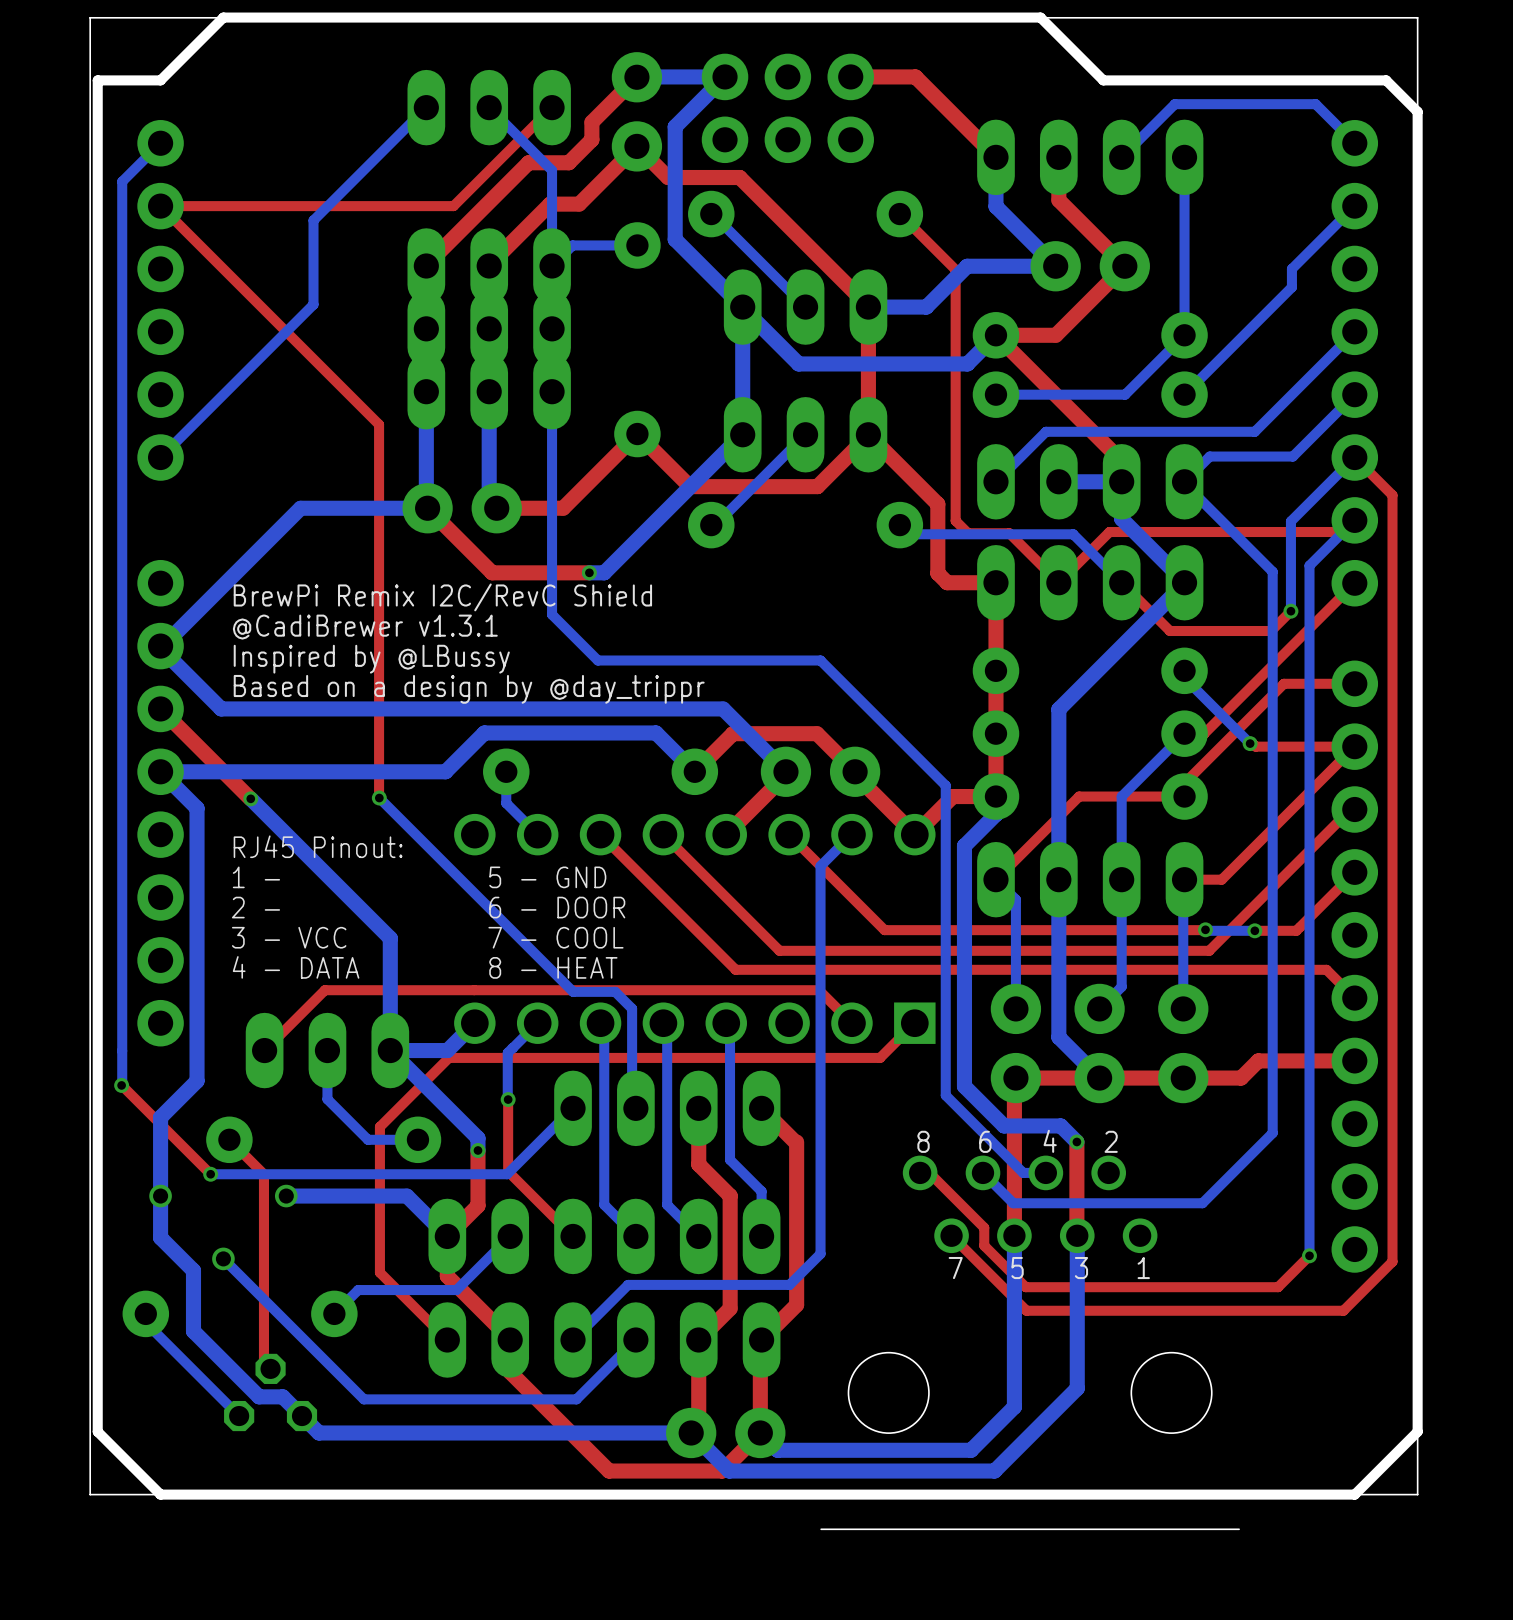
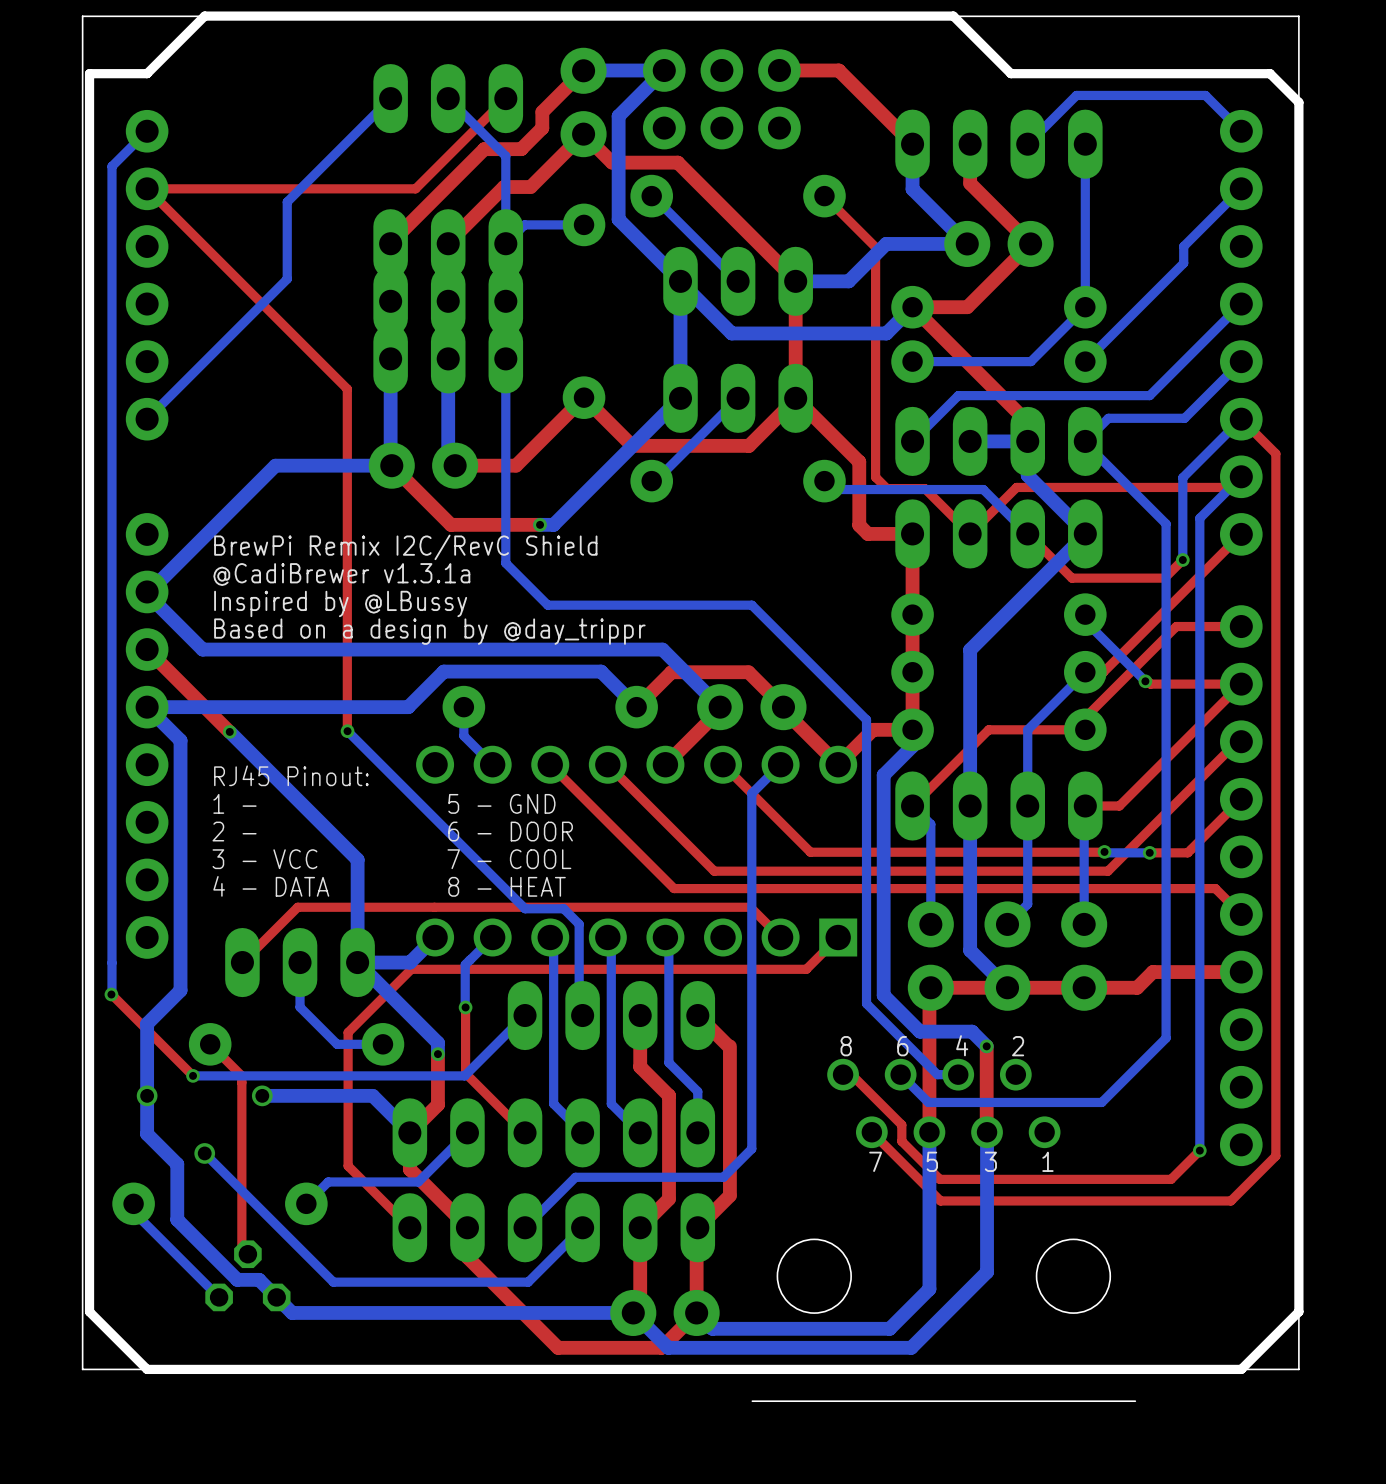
text: @CadiBrewer v1.3.1 (365, 627) -> @CadiBrewer v1.3.1a (341, 574)

